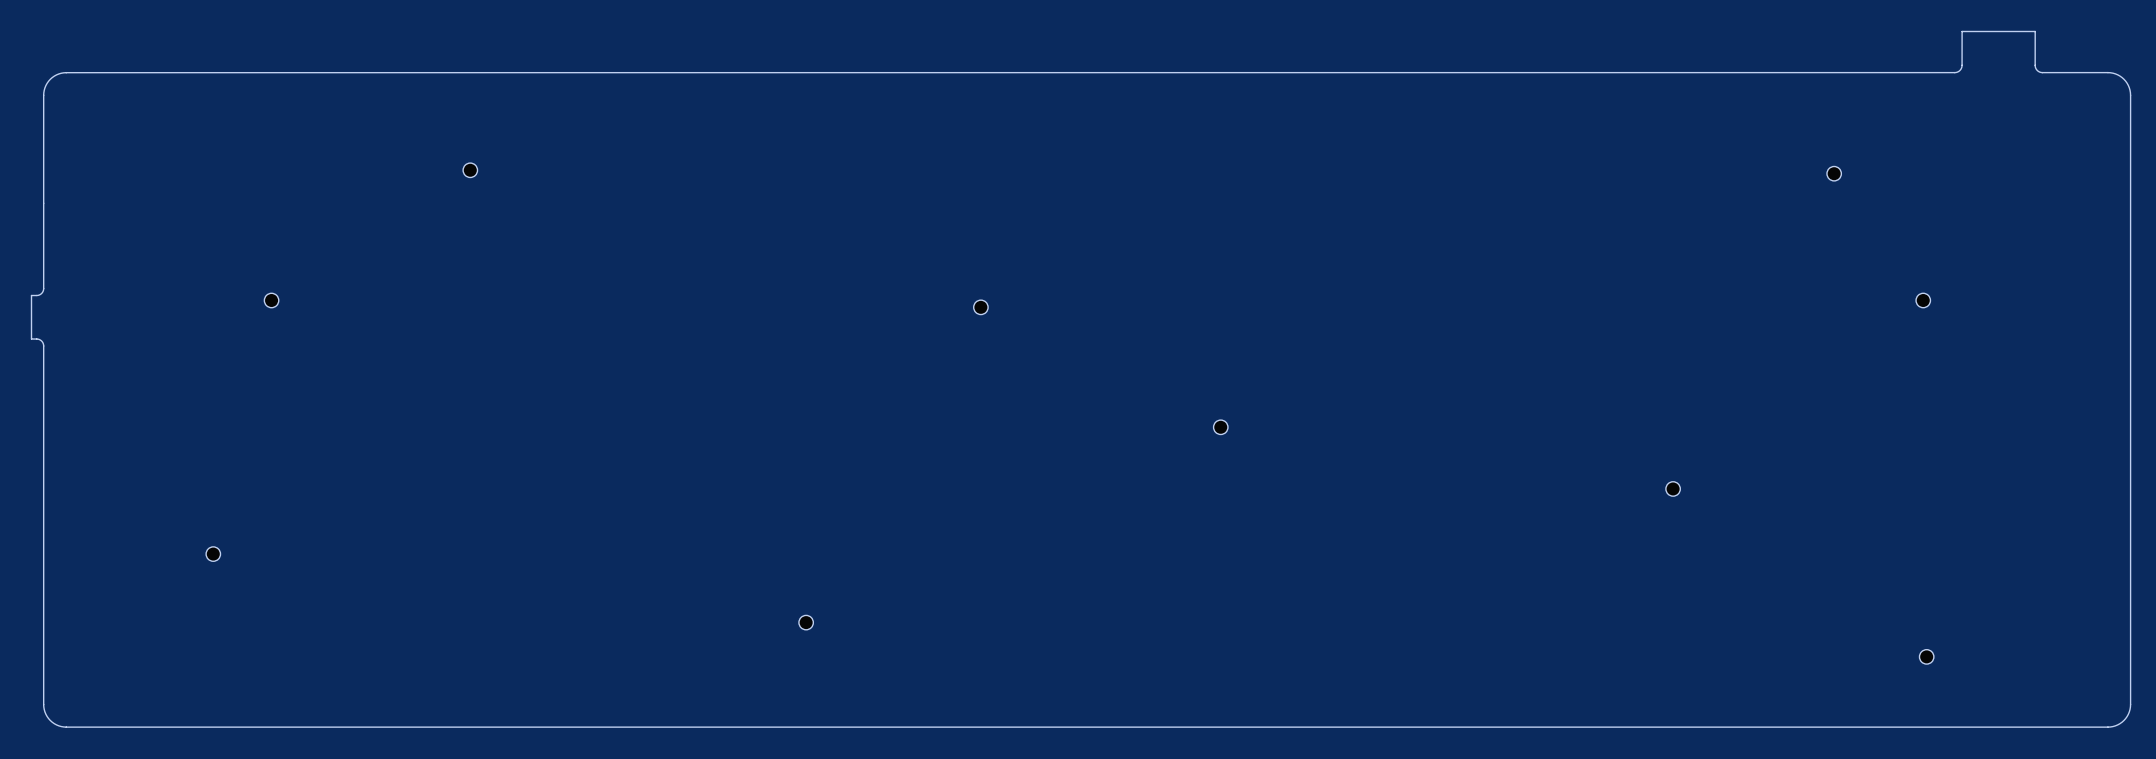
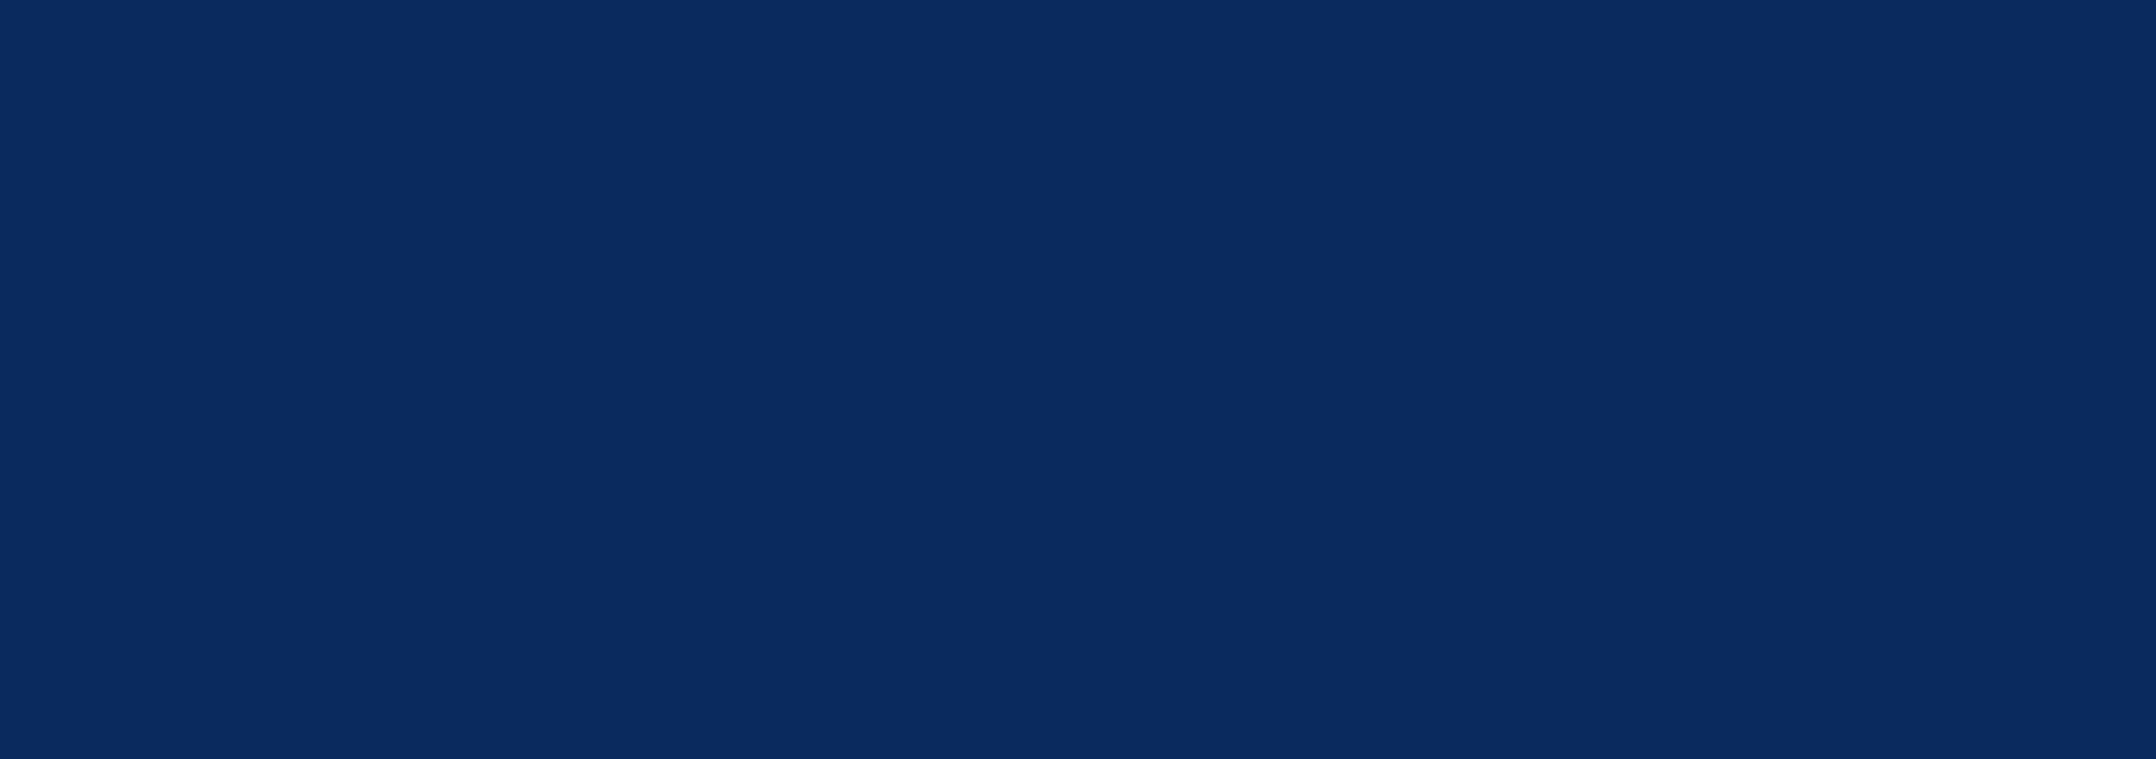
board edge: (2035, 31) (1962, 31) (1961, 66) (1959, 71) (1954, 72) (58, 73) (48, 81) (43, 92) (43, 288) (40, 294) (31, 295) (31, 339) (40, 339) (43, 345) (44, 711) (54, 723) (66, 727) (2115, 725) (2127, 716) (2130, 704) (2130, 92) (2123, 79) (2112, 73) (2038, 71) (2035, 66) (2035, 31) -> none
part: (470, 170) -> none
part: (1834, 173) -> none
part: (271, 300) -> none
part: (1923, 300) -> none
part: (980, 307) -> none
part: (1220, 427) -> none
part: (1673, 488) -> none
part: (213, 554) -> none
part: (806, 622) -> none
part: (1926, 656) -> none

